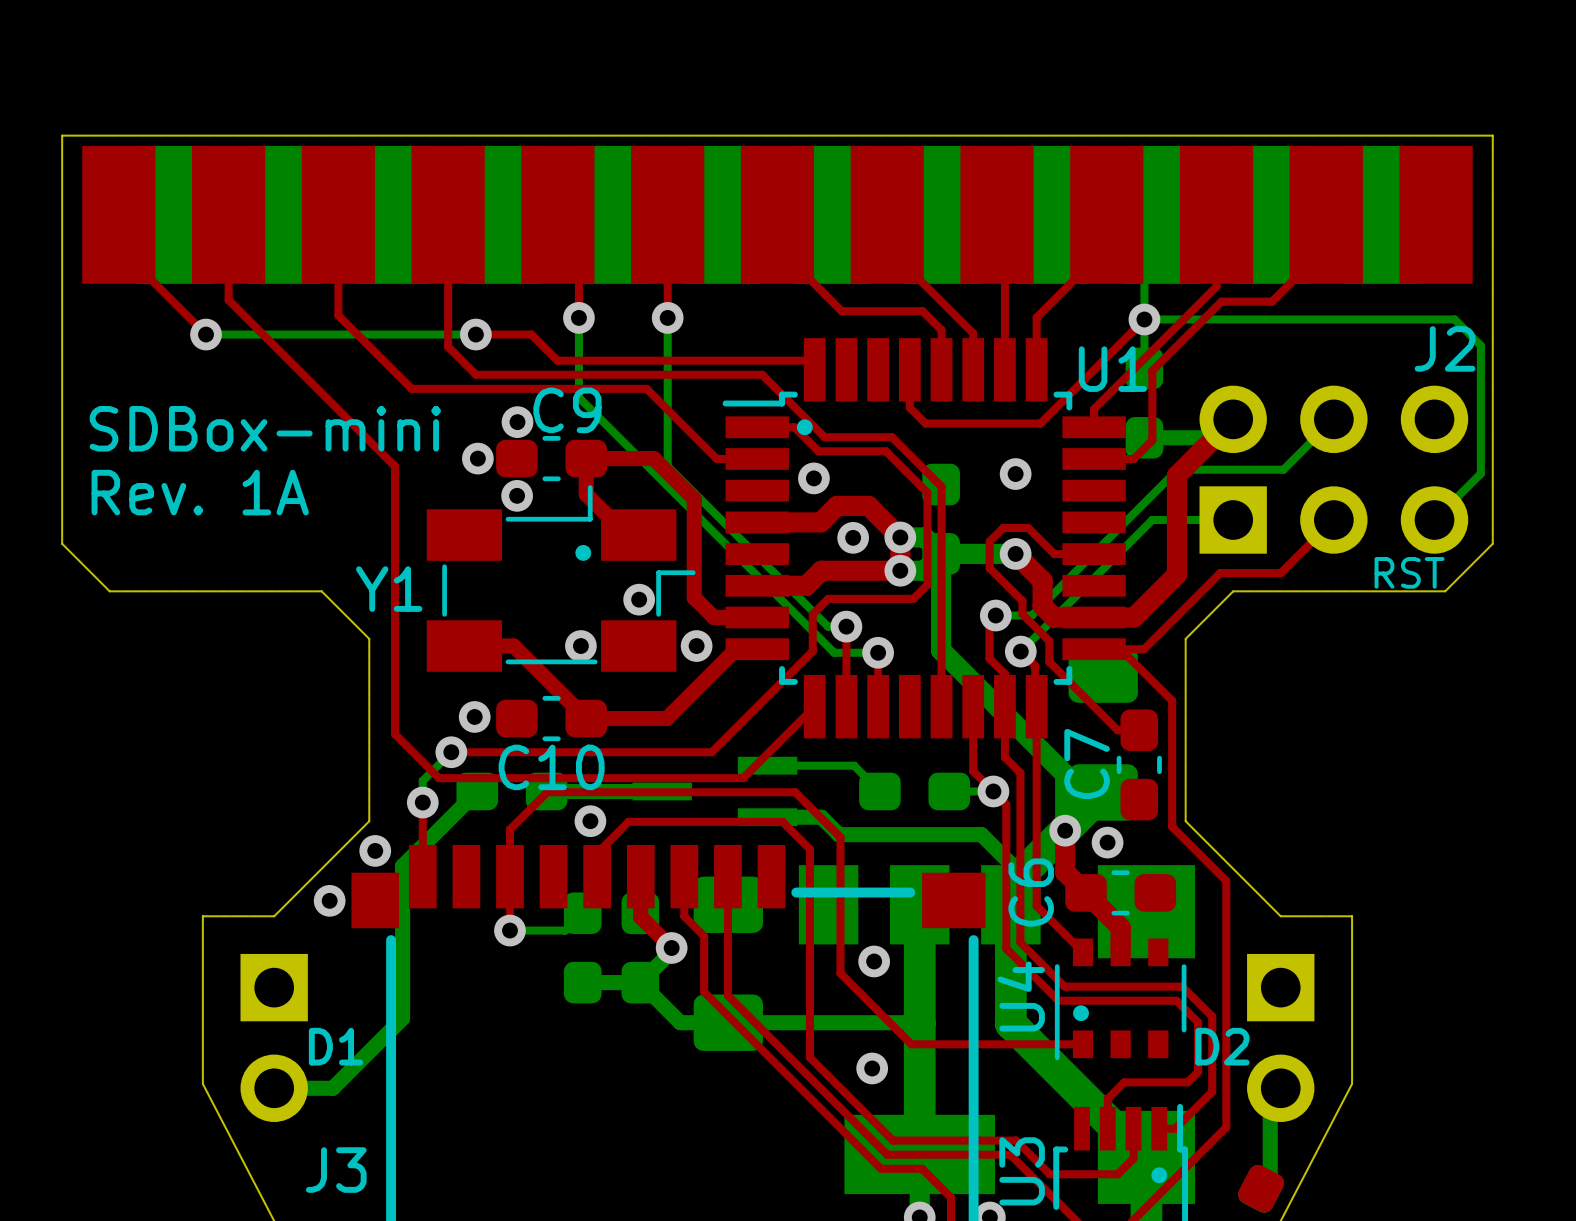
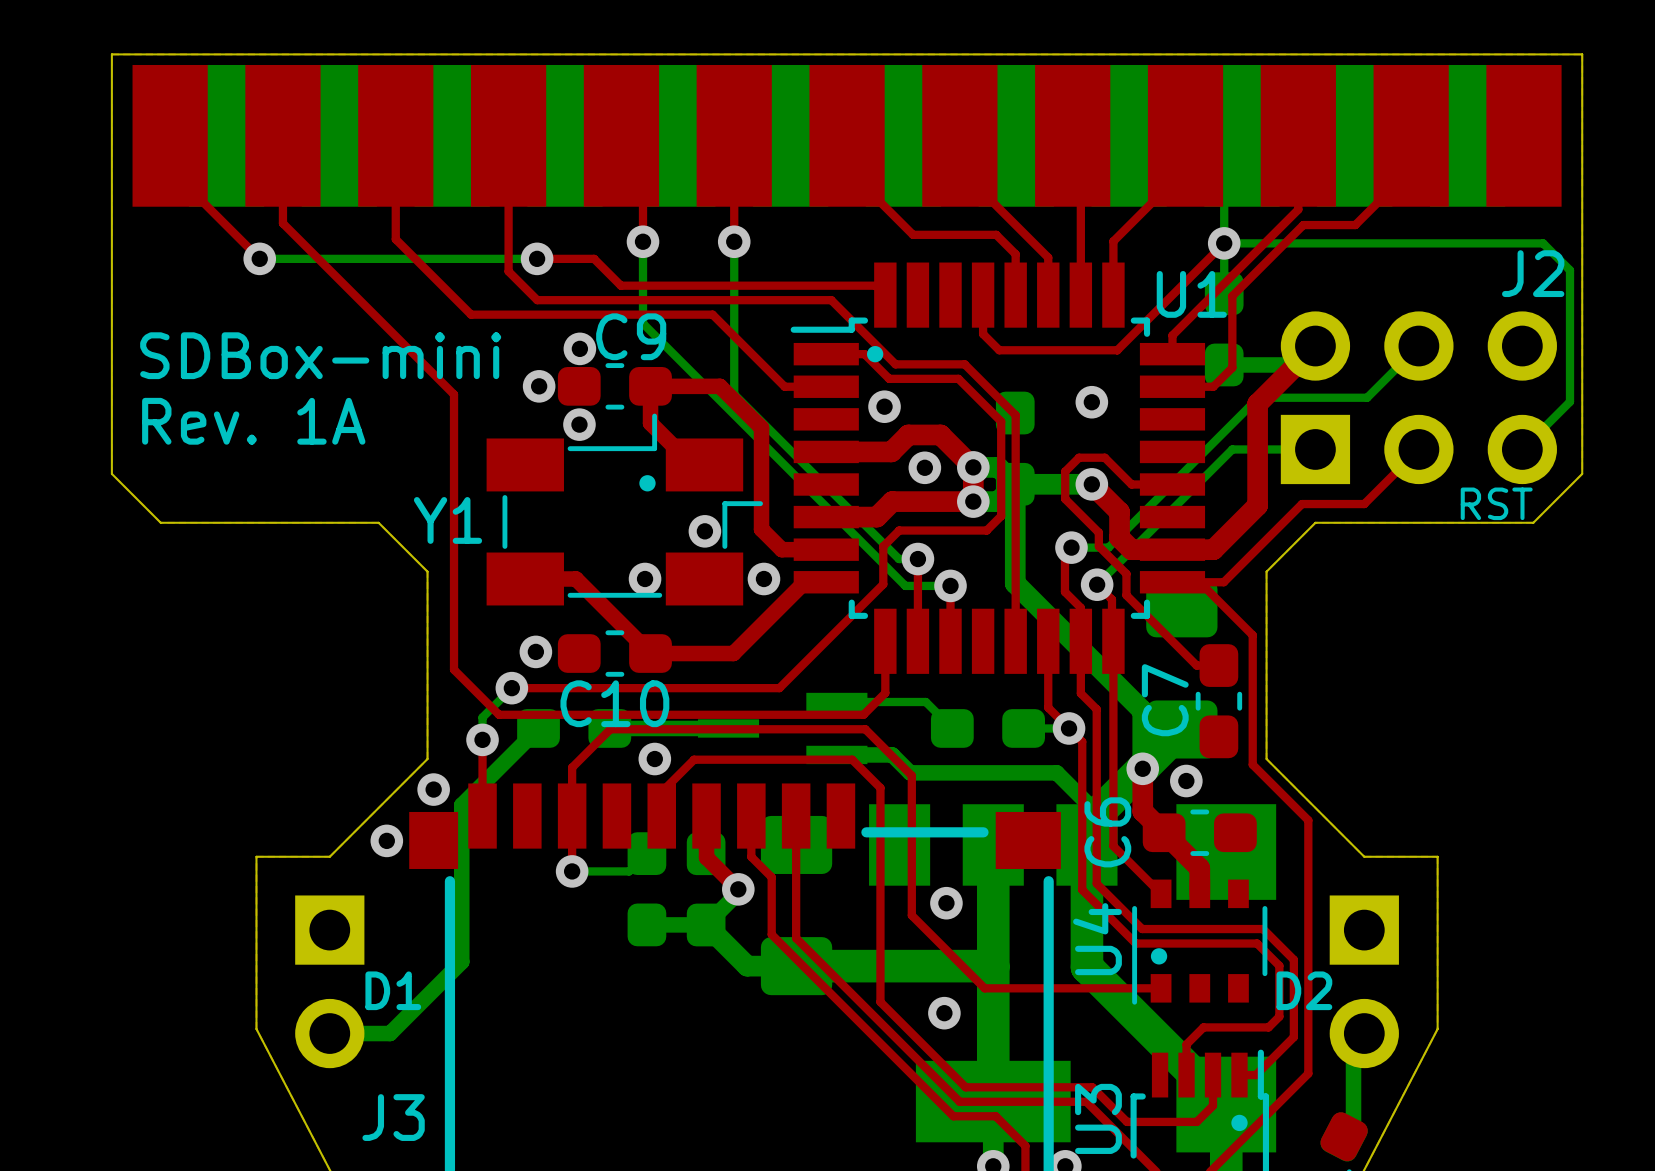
top track: (814, 706) (743, 778) -> (885, 641) (885, 693) (863, 714) (811, 714)
bottom track width: thin (640, 982) (680, 1022) (919, 1022) -> thick (706, 924) (747, 966) (992, 966)

